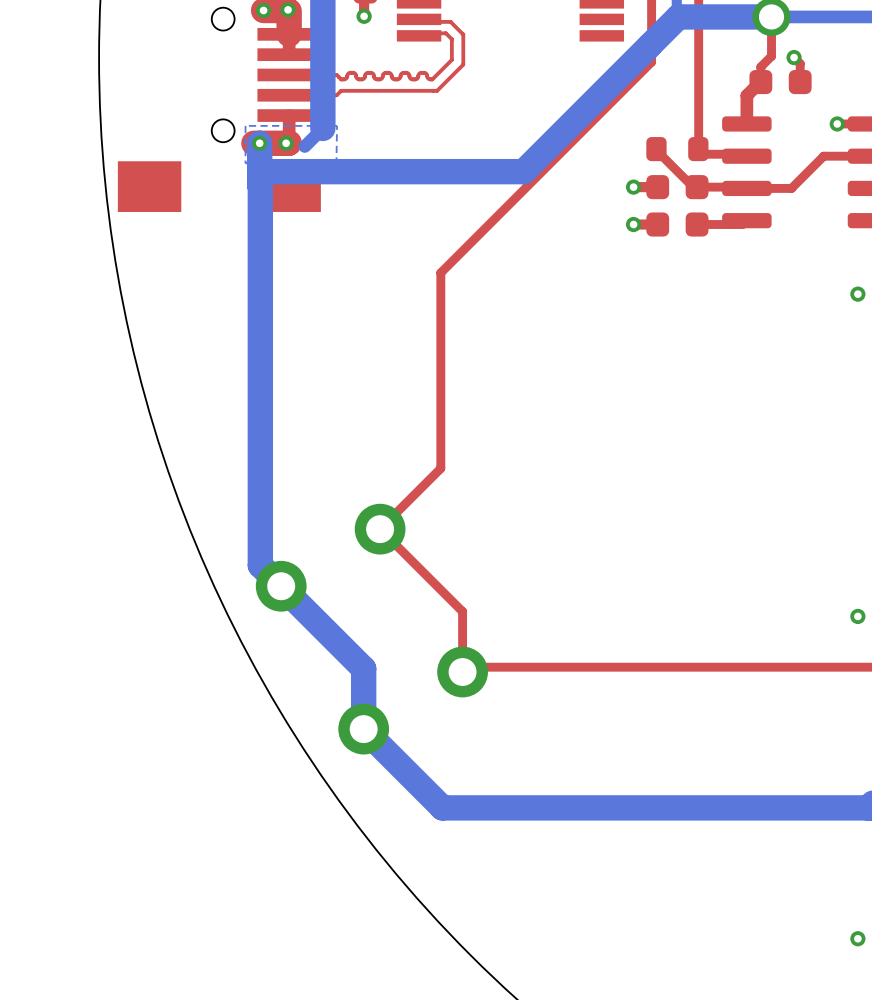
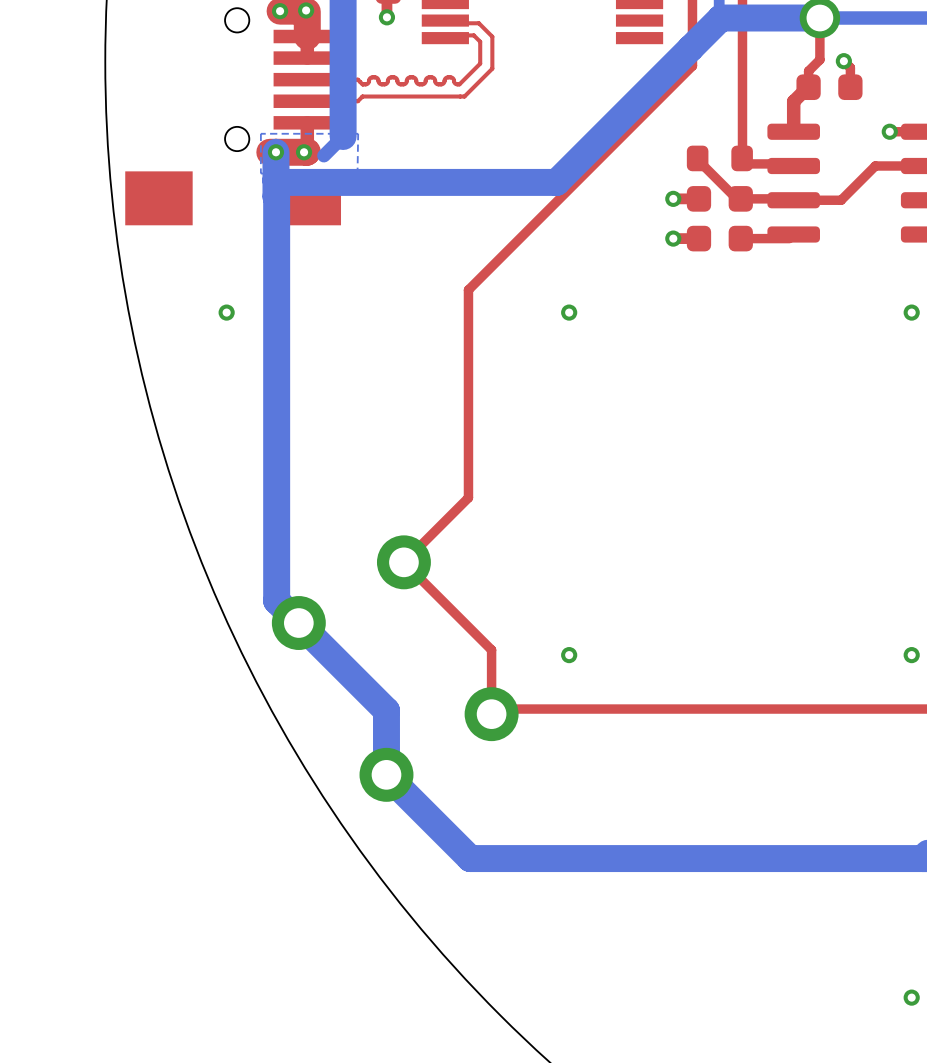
via: none -> (226, 312)
via: none -> (569, 312)
via: none -> (569, 655)

